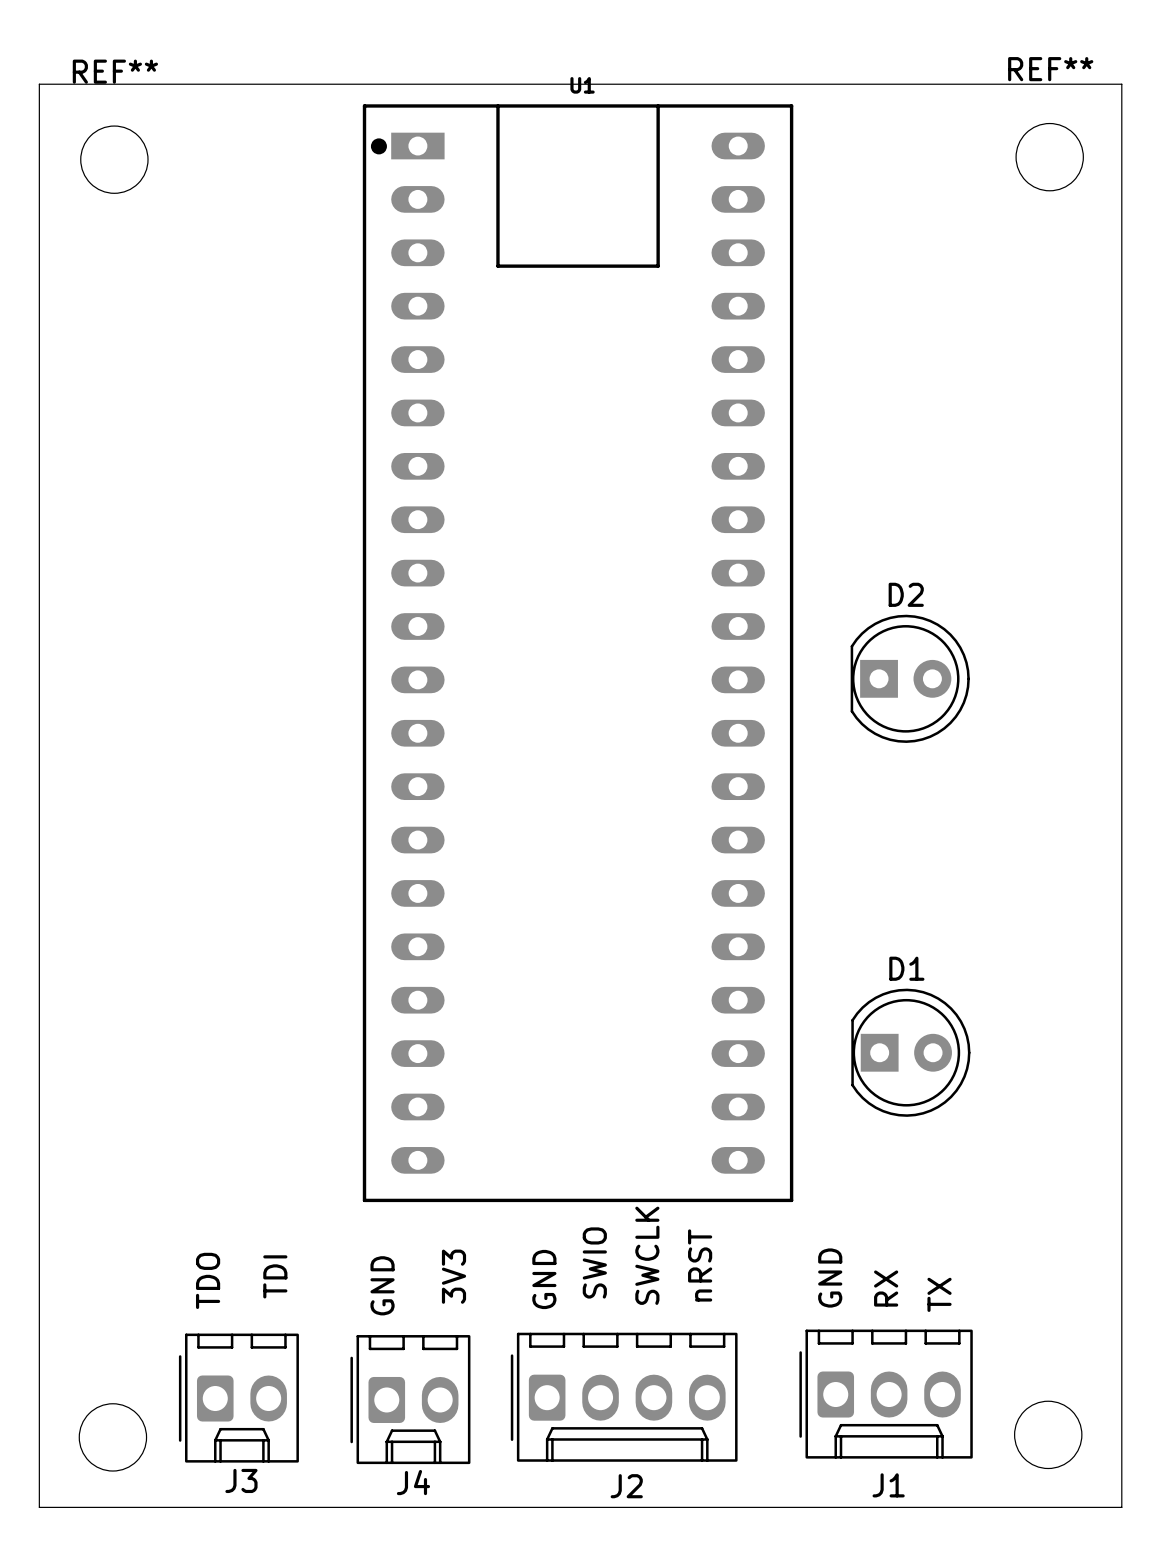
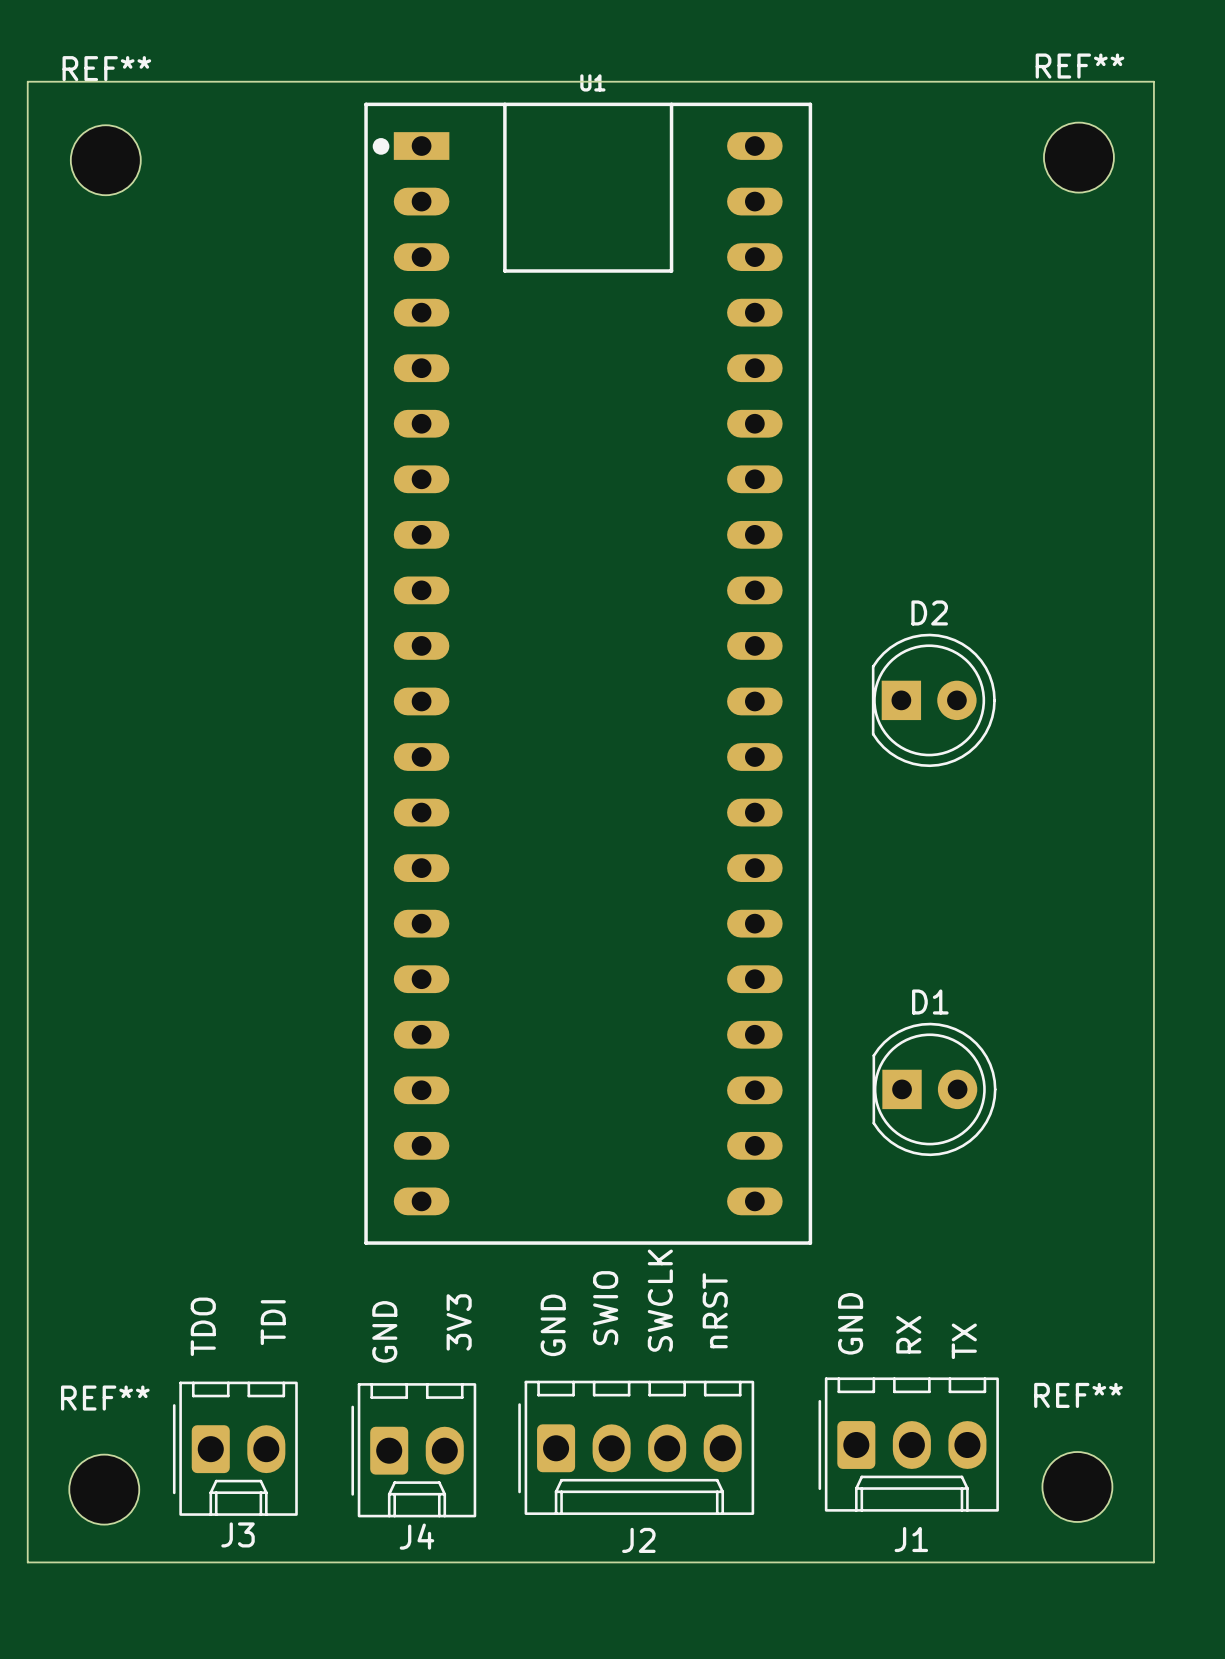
REF** name: none -> REF** (1078, 1395)
REF** name: none -> REF** (105, 1398)

